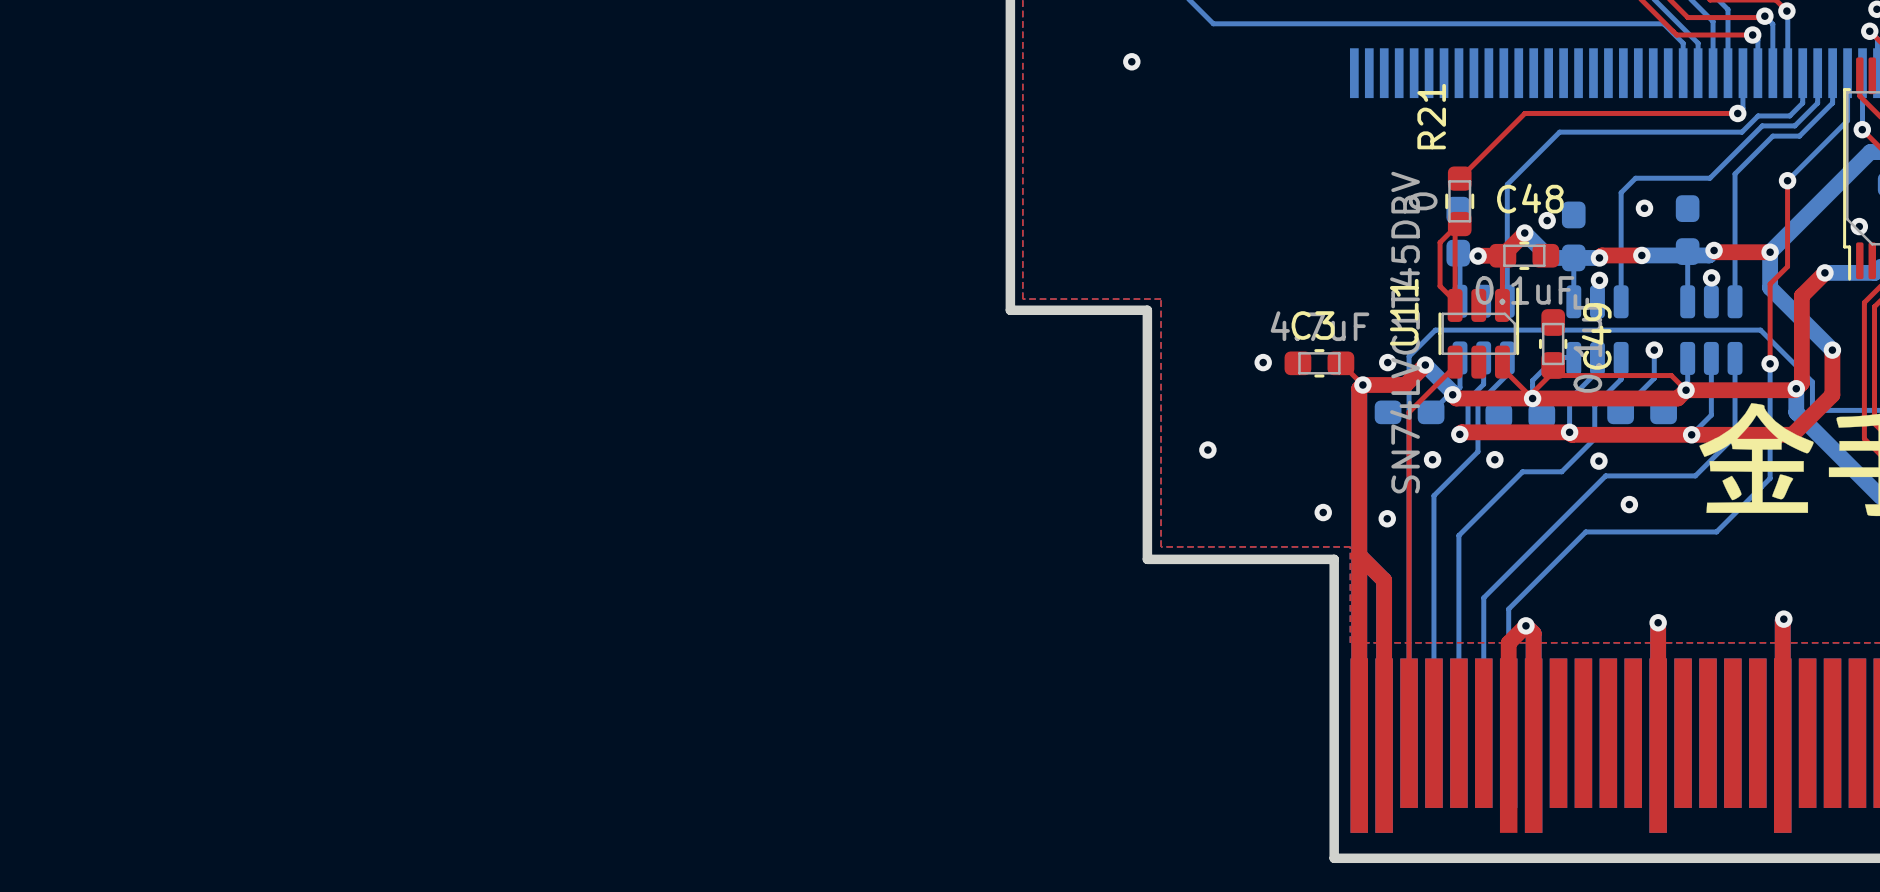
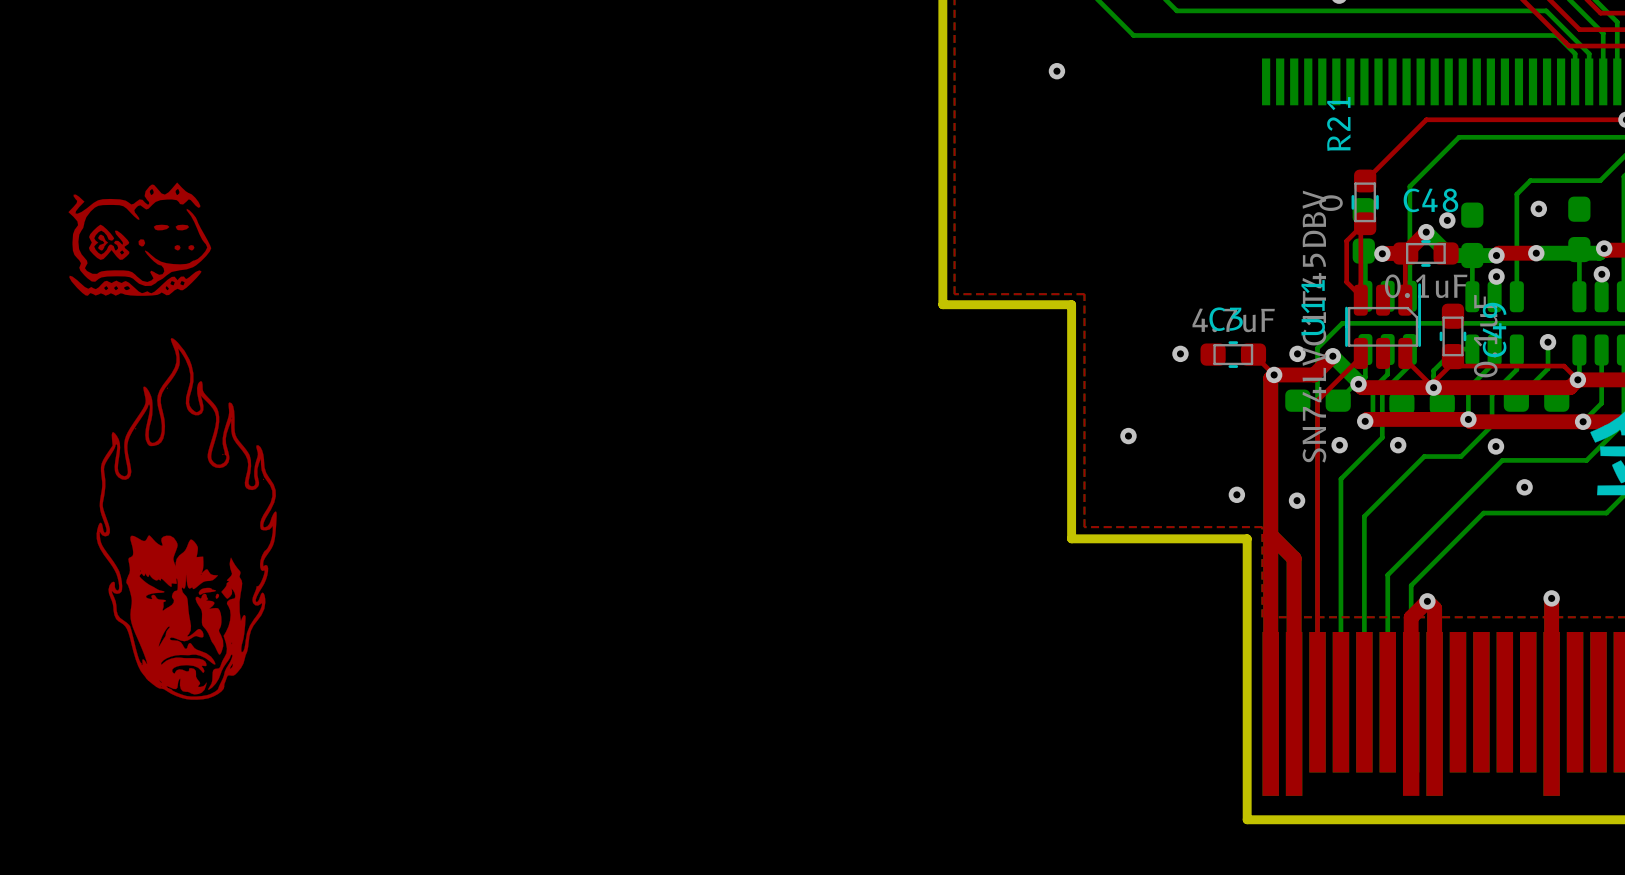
drawing: none -> [68, 182, 212, 296]
drawing: none -> [96, 338, 277, 700]

